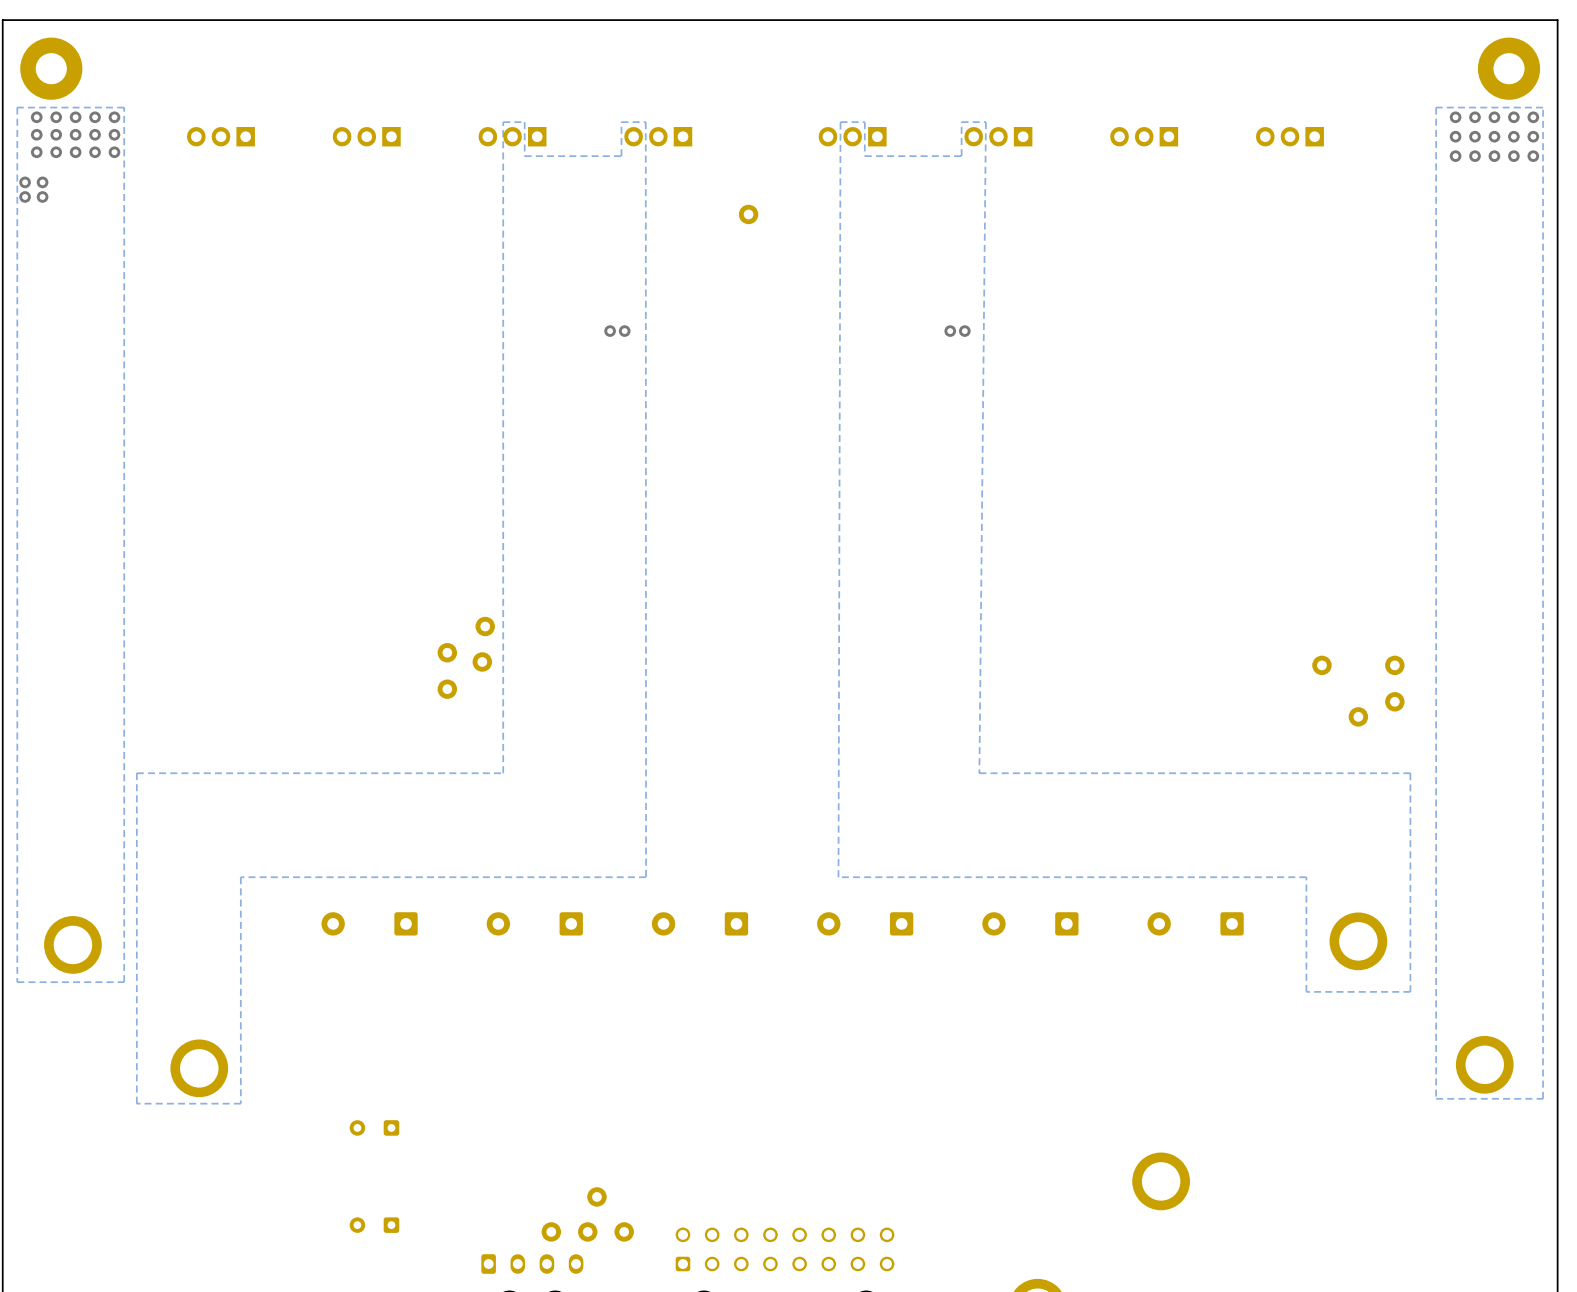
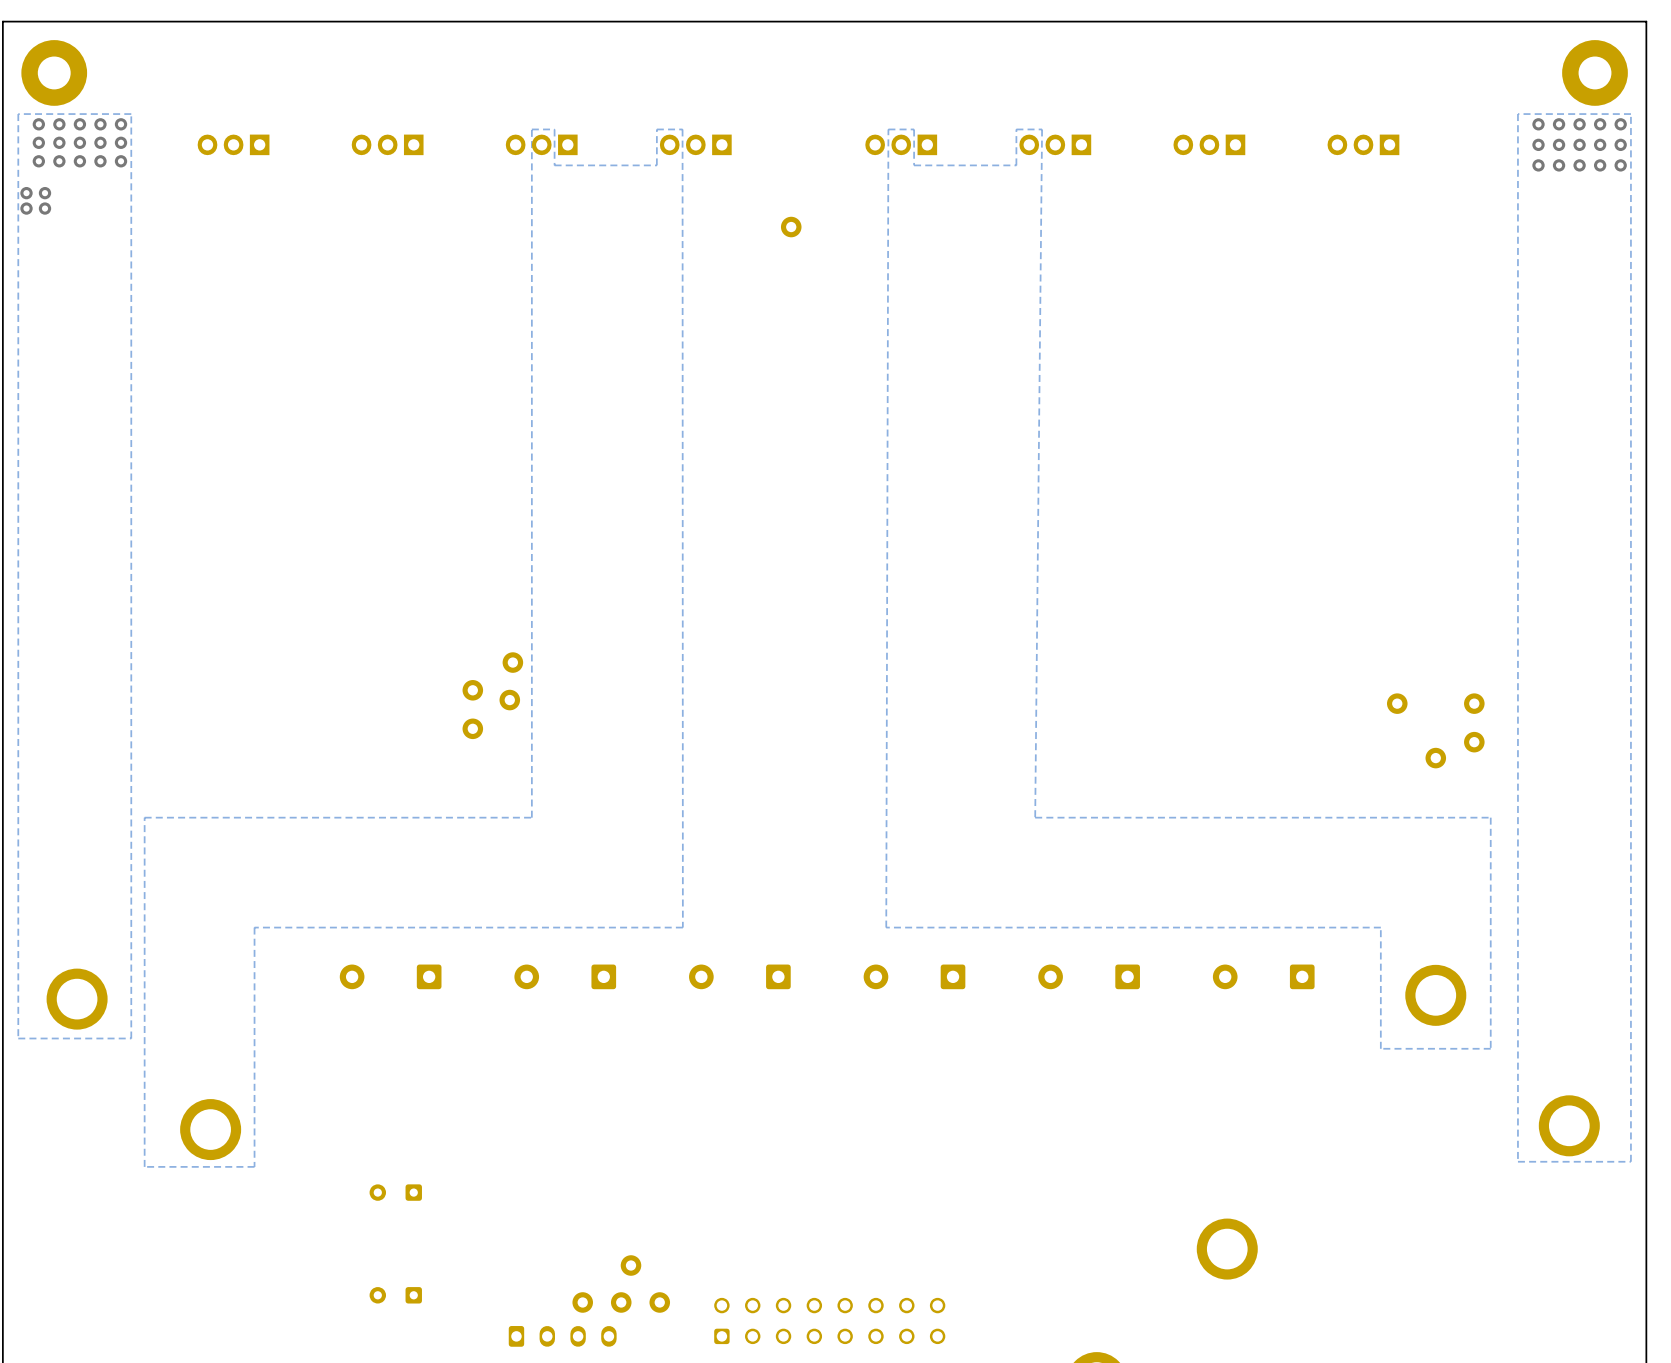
via: (610, 331) -> none
via: (624, 331) -> none
via: (950, 331) -> none
via: (964, 331) -> none

